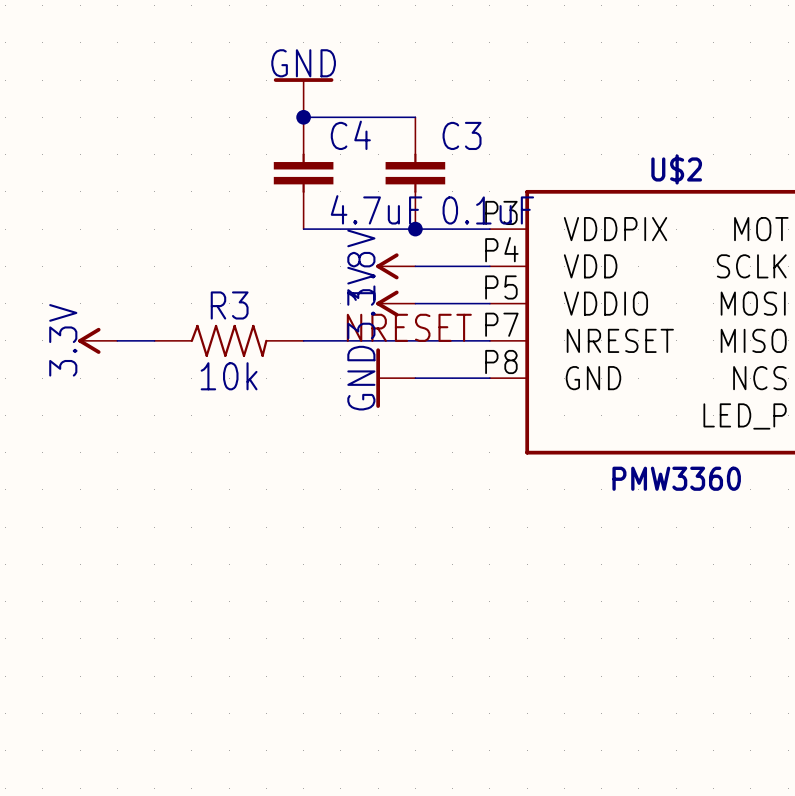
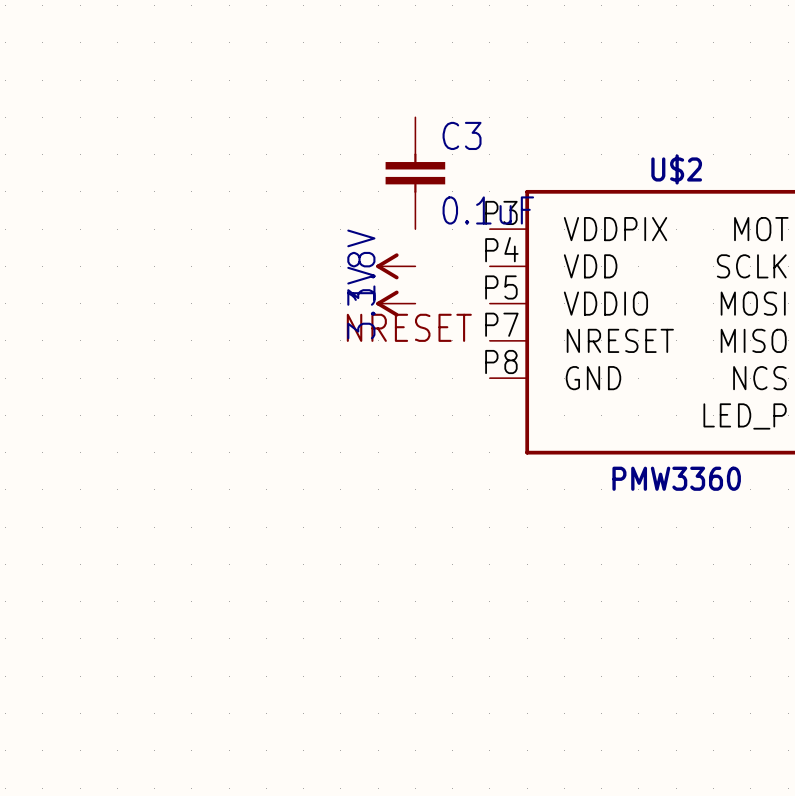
power symbol: GND (303, 97) -> none
wire: (303, 117) (415, 117) -> none
junction: (303, 117) -> none
C4: 4.7uF (303, 173) -> none
wire: (303, 229) (489, 229) -> none
junction: (415, 229) -> none
wire: (415, 266) (489, 266) -> none
wire: (415, 303) (489, 303) -> none
power symbol: 3.3V (97, 340) -> none
wire: (117, 340) (154, 340) -> none
R3: 10k (229, 340) -> none
wire: (303, 340) (489, 340) -> none
power symbol: GND (395, 378) -> none
wire: (415, 378) (489, 378) -> none

